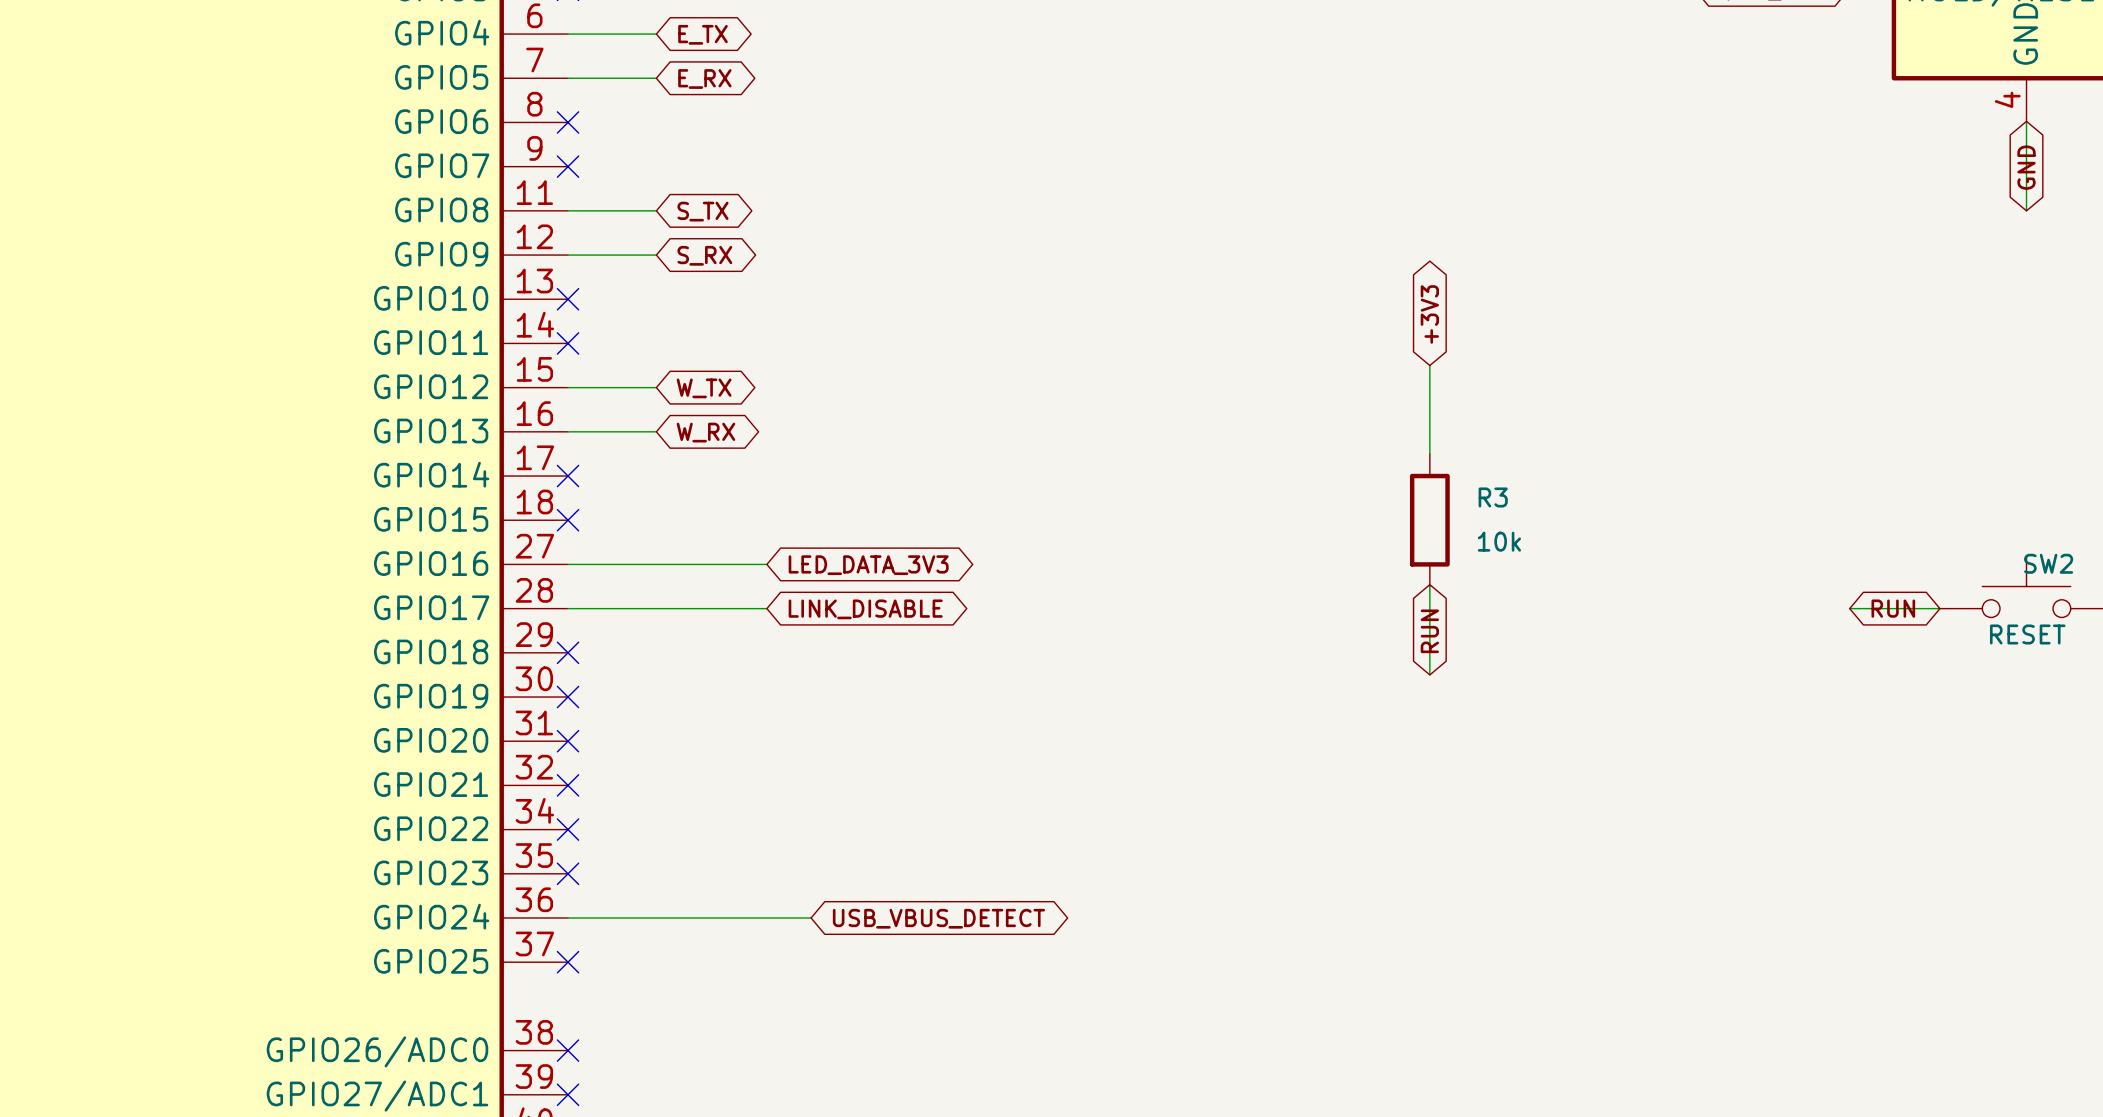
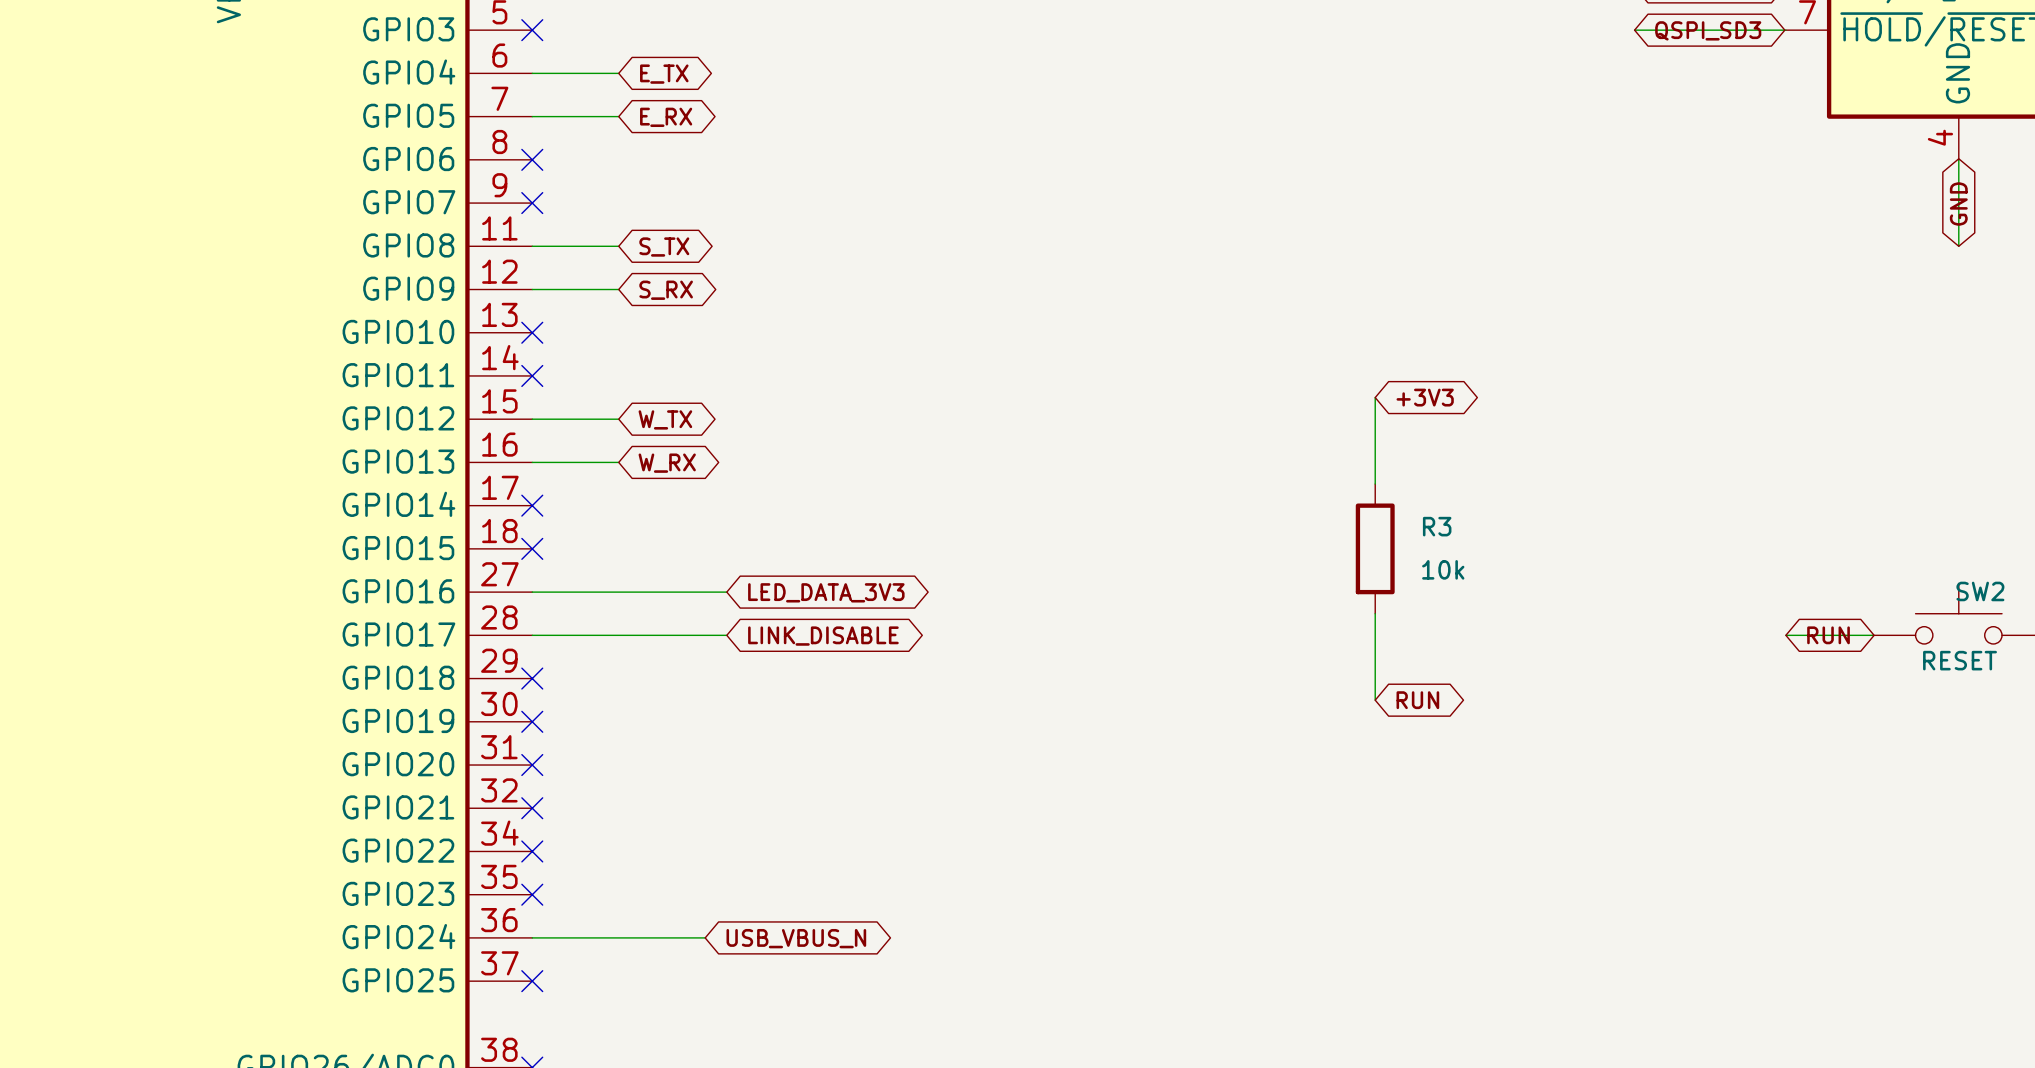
global label rotation: 0° (1429, 314) -> 90° clockwise (1425, 397)
global label rotation: 0° (1429, 631) -> 90° clockwise (1417, 700)
wire: (744, 917) (811, 917) -> none
global label: USB_VBUS_DETECT (938, 918) -> USB_VBUS_N (796, 938)

